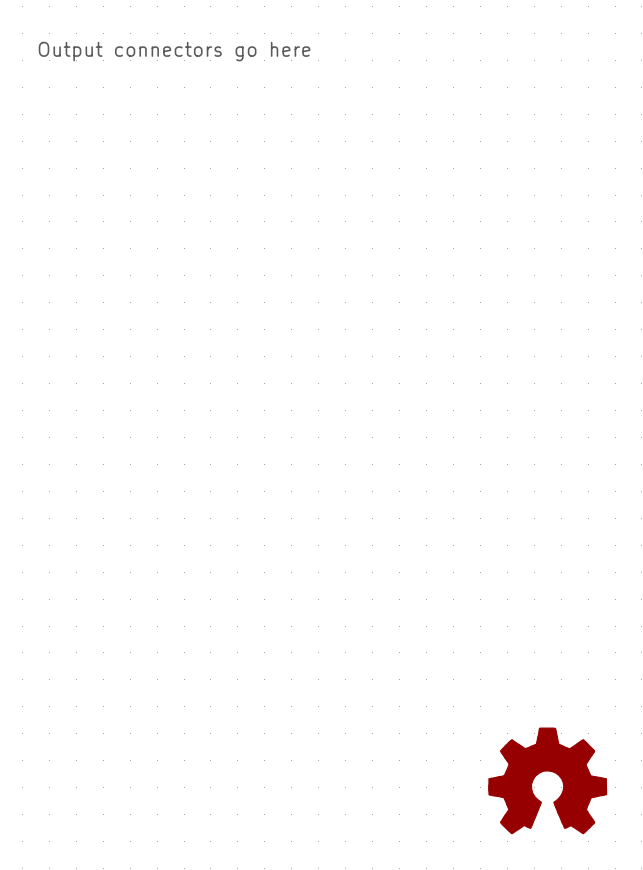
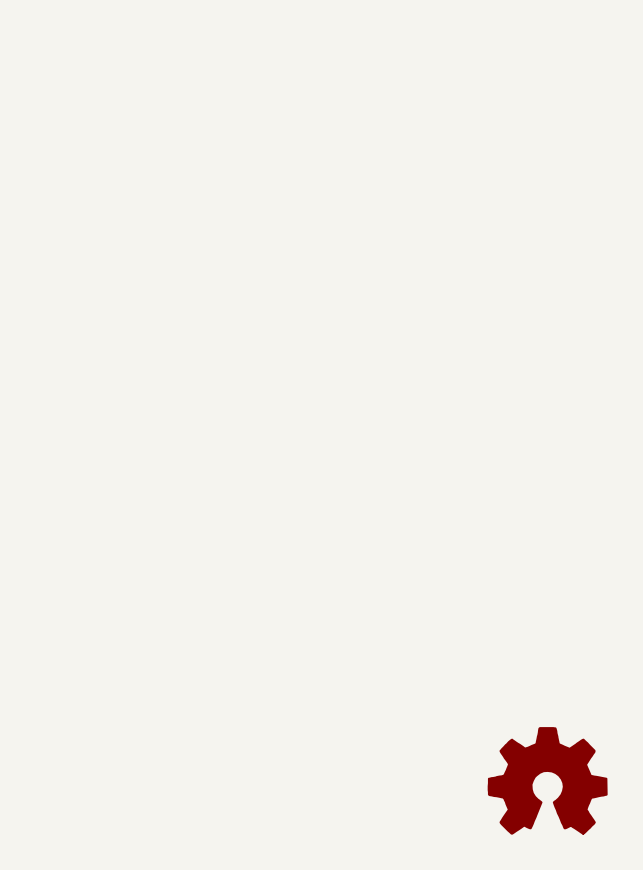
text: Output connectors go here (174, 51) -> none

